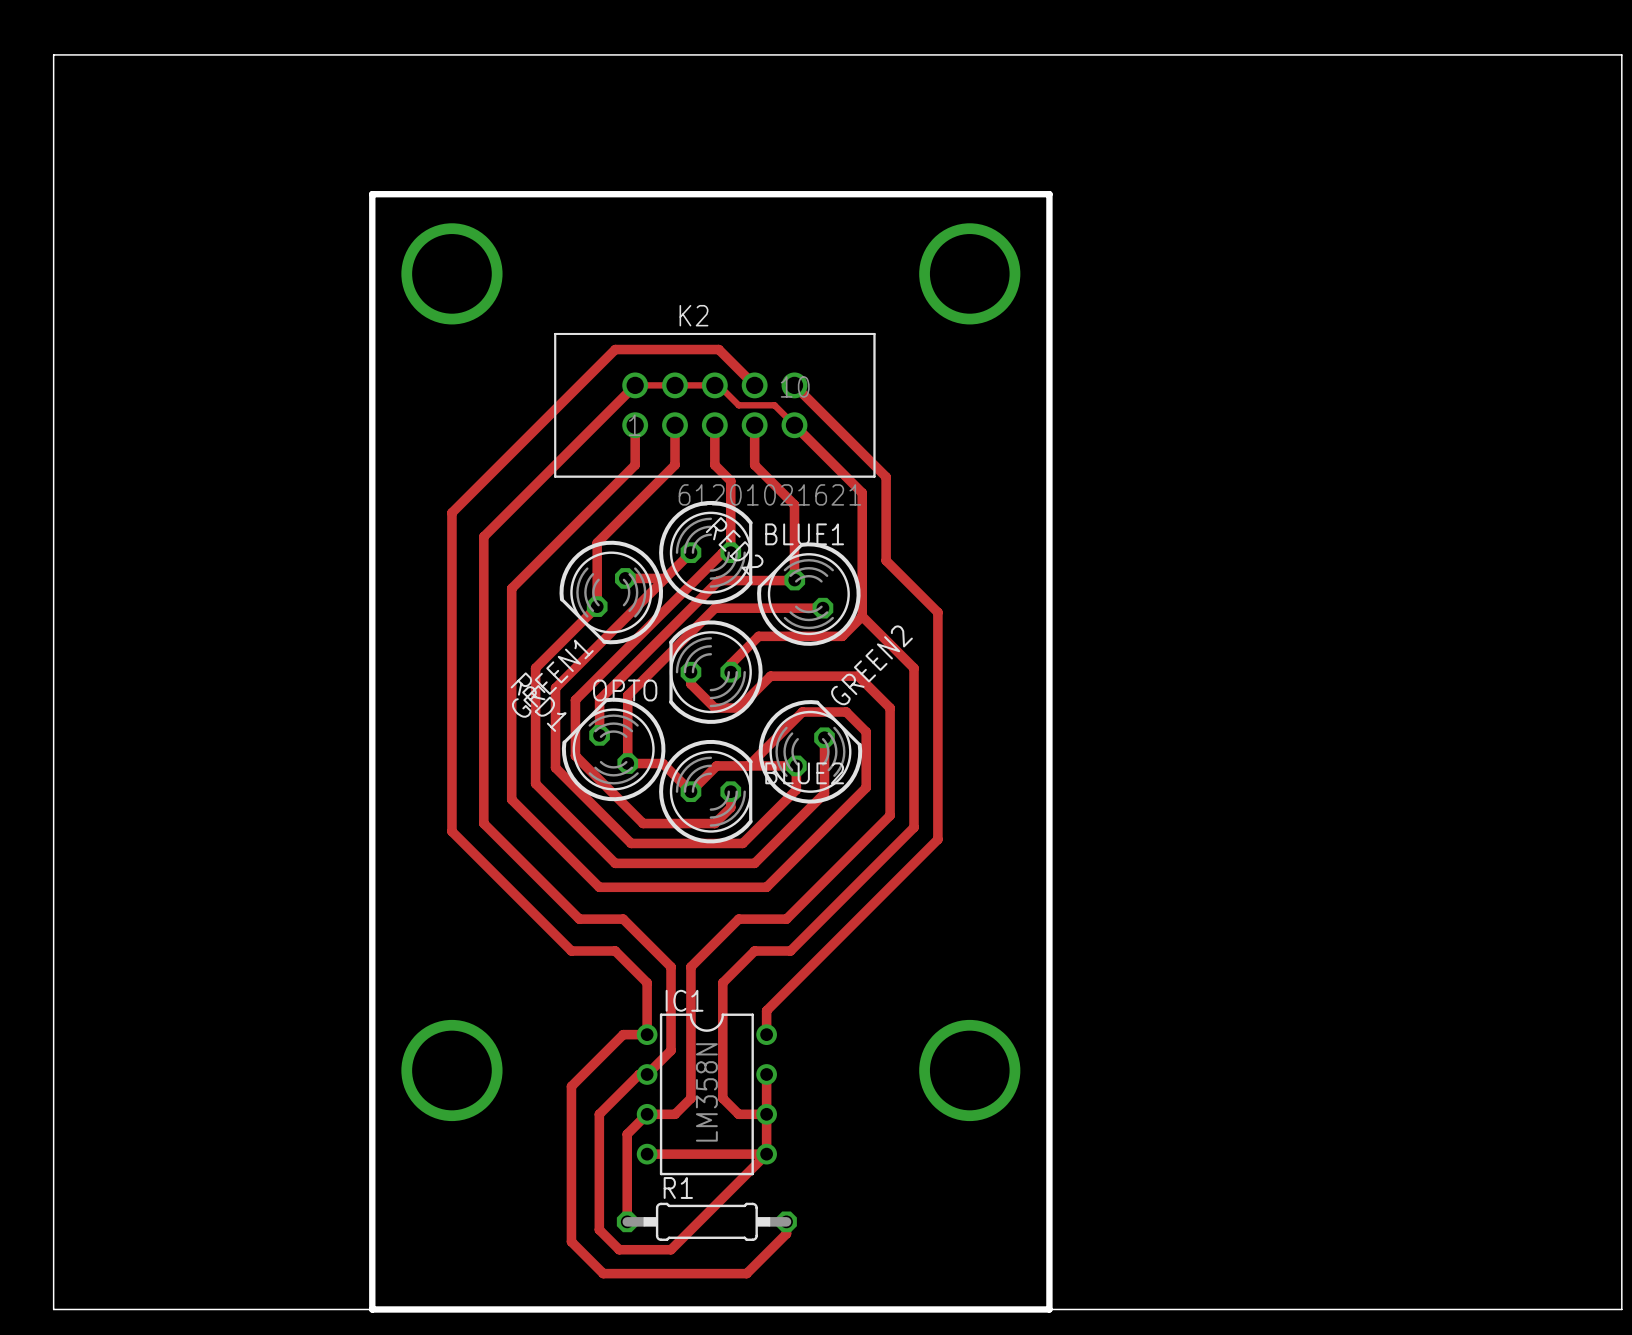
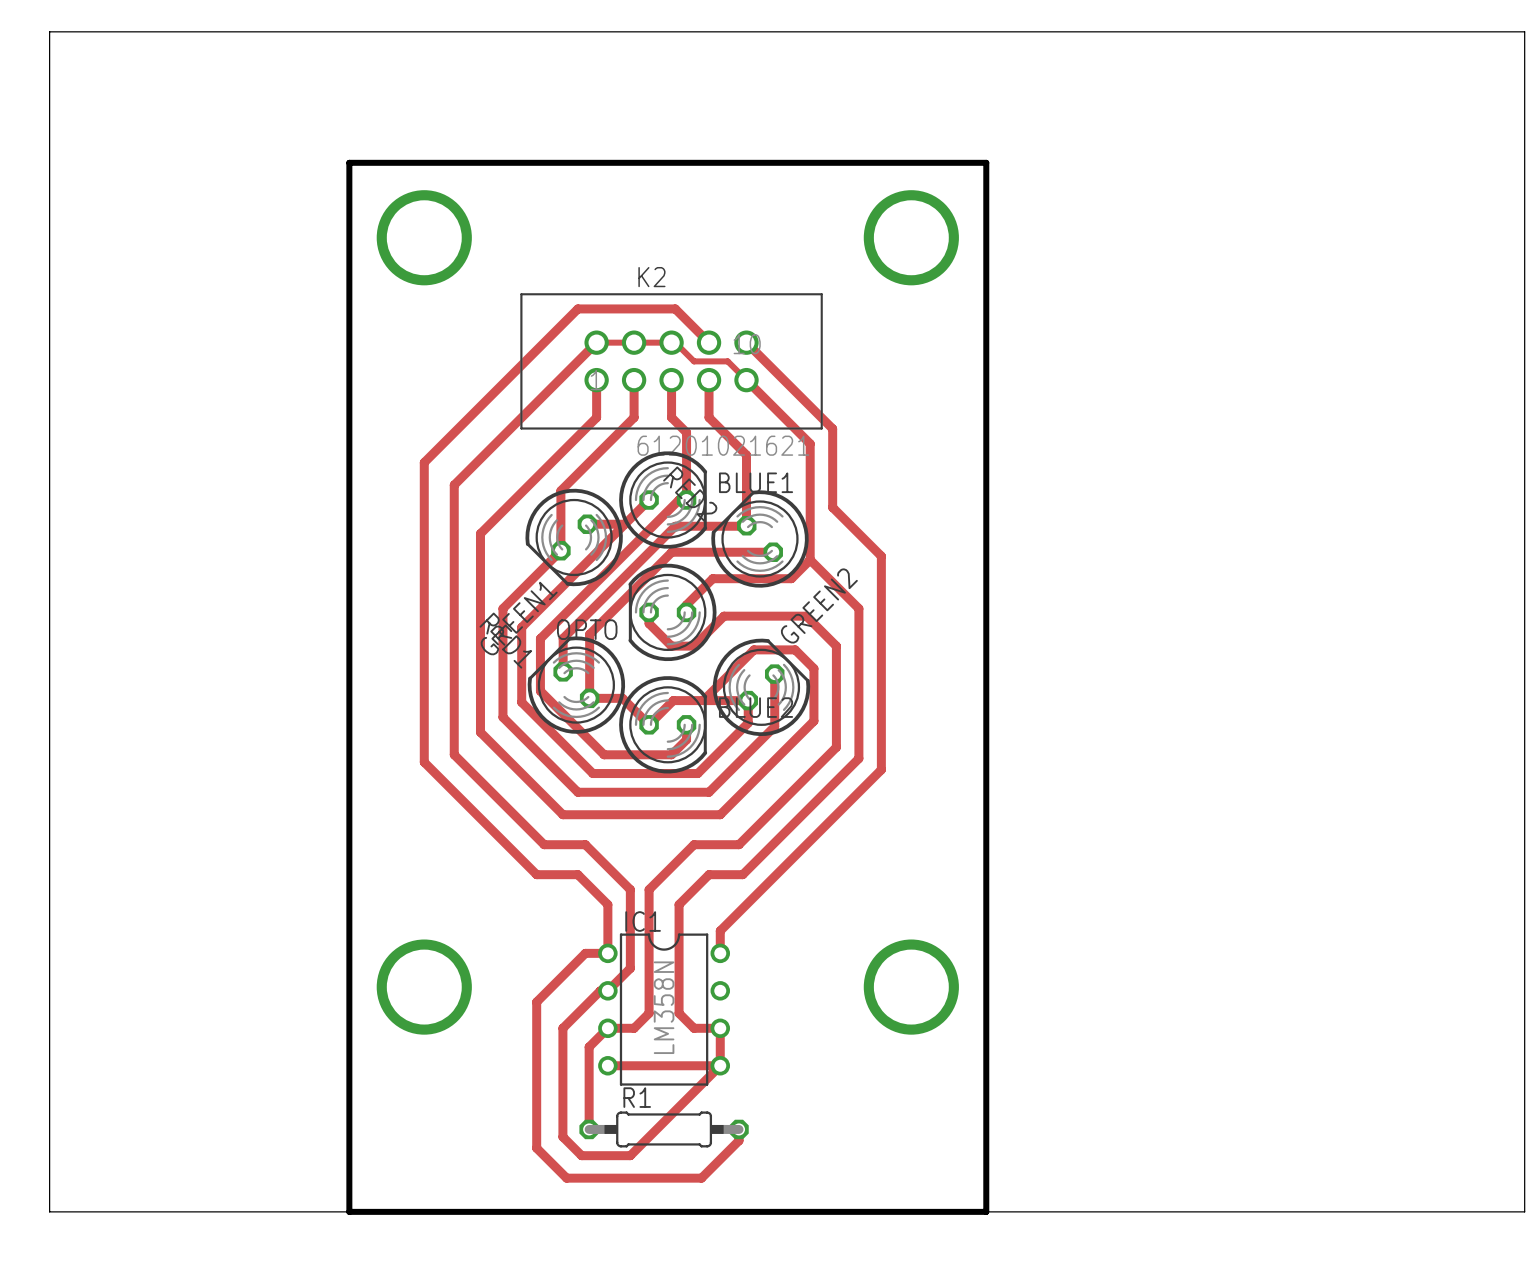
track: (766, 1074) (766, 1114) -> none

